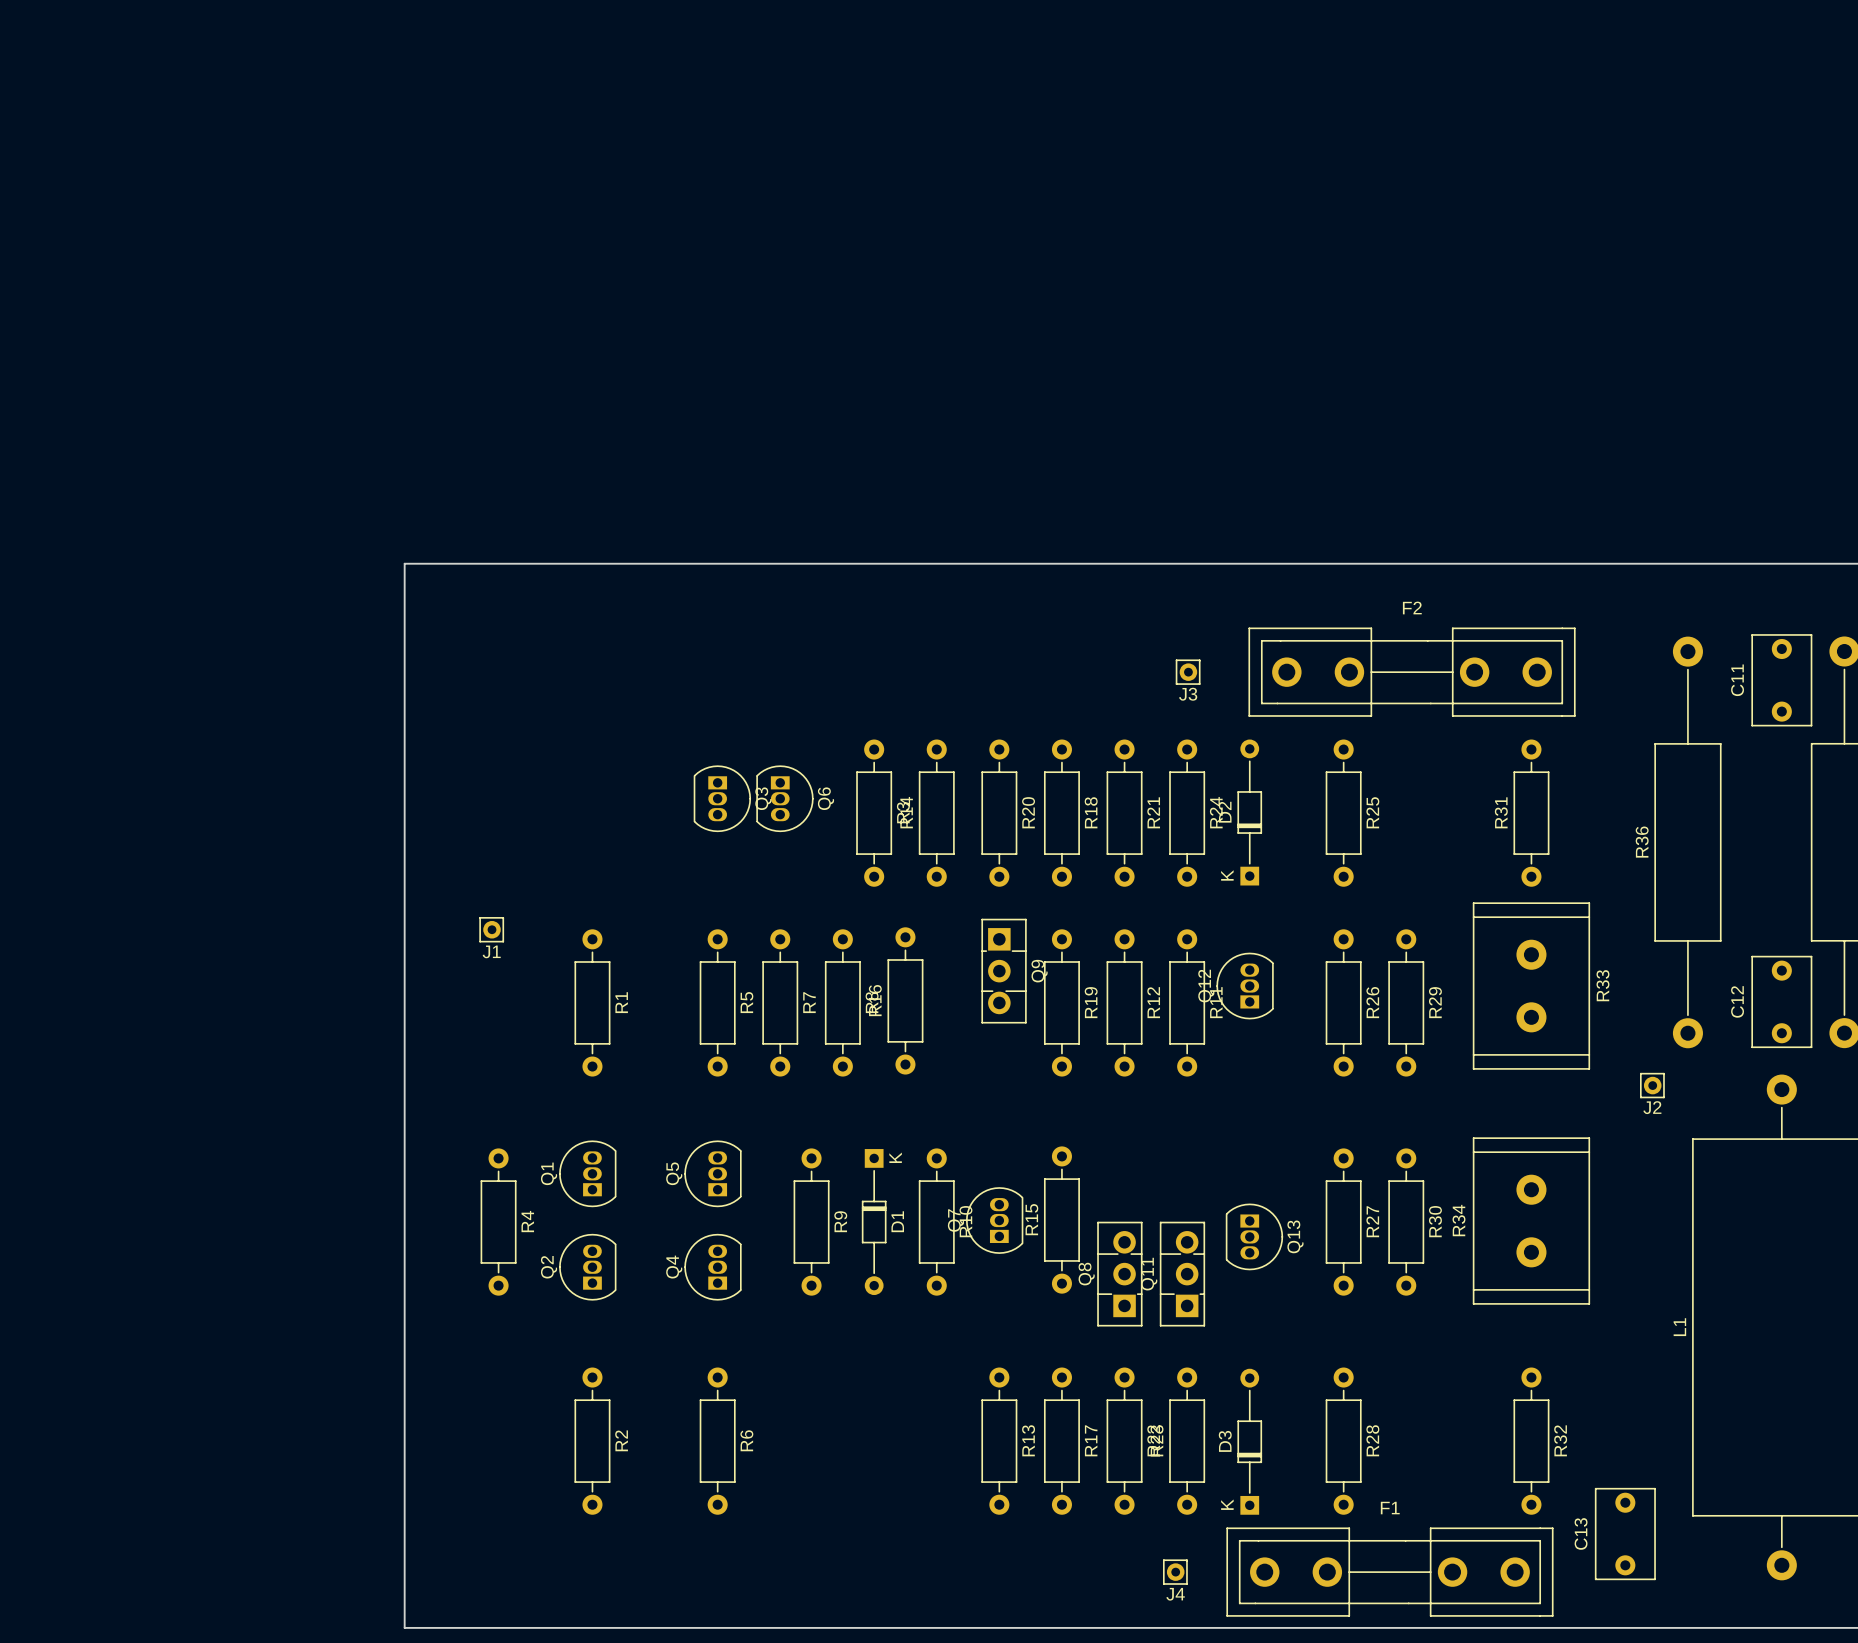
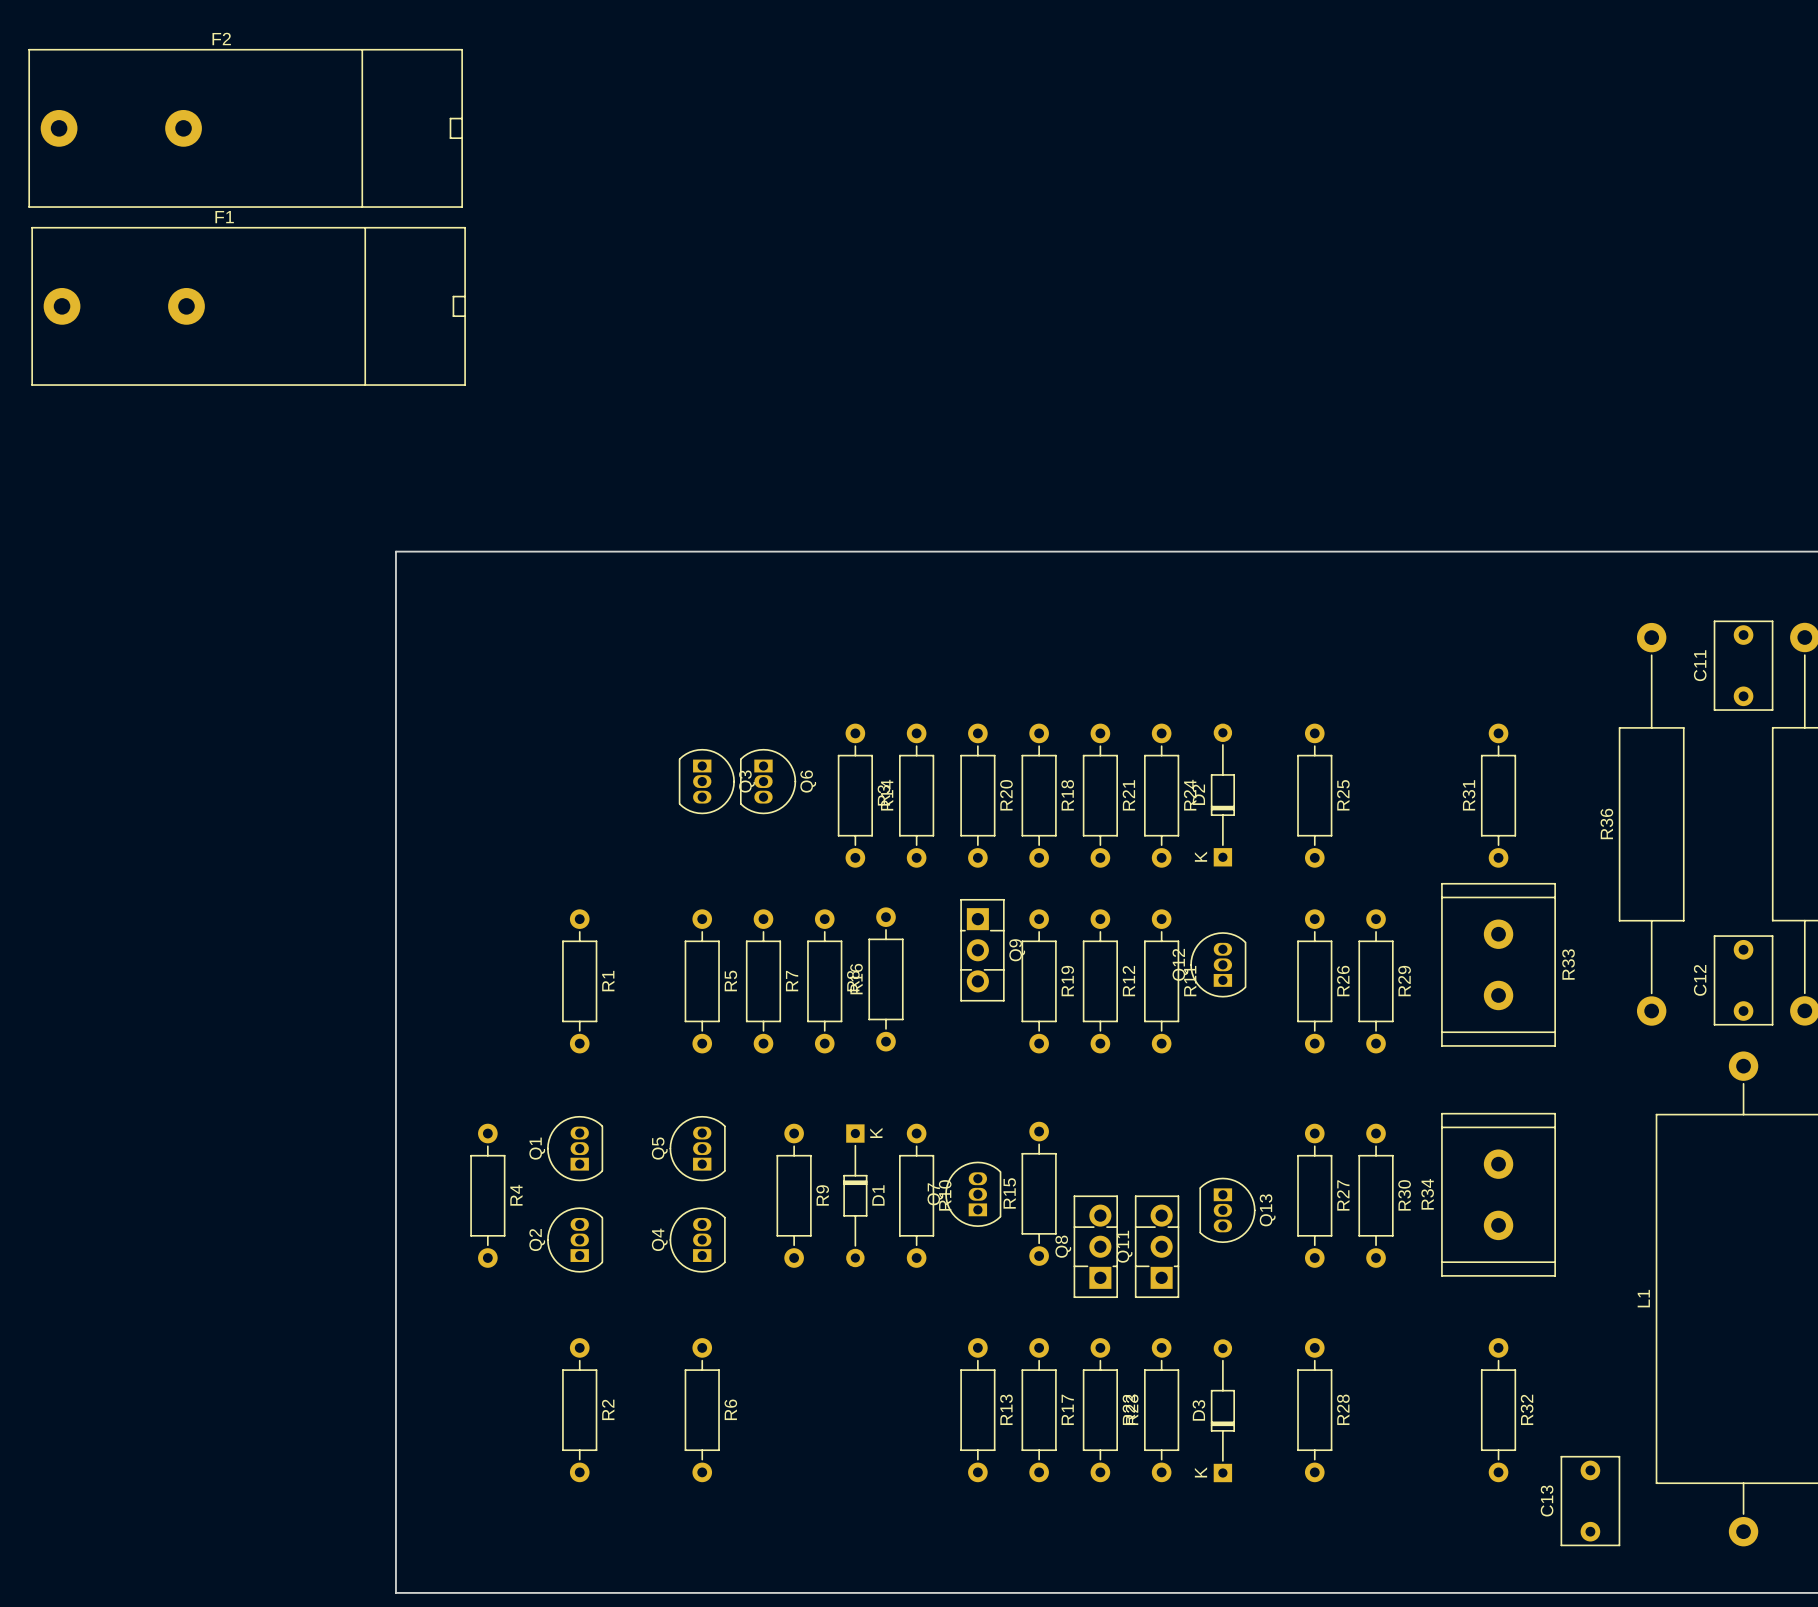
F2 name position: F2 (1412, 607) -> F2 (221, 39)
F2 footprint: [1248, 627, 1576, 717] -> [28, 48, 463, 208]
J3: (1188, 672) -> none
J1: (491, 929) -> none
J2: (1652, 1085) -> none
F1 name position: F1 (1390, 1508) -> F1 (224, 217)
F1 footprint: [1226, 1527, 1554, 1617] -> [31, 226, 466, 386]
J4: (1175, 1572) -> none

